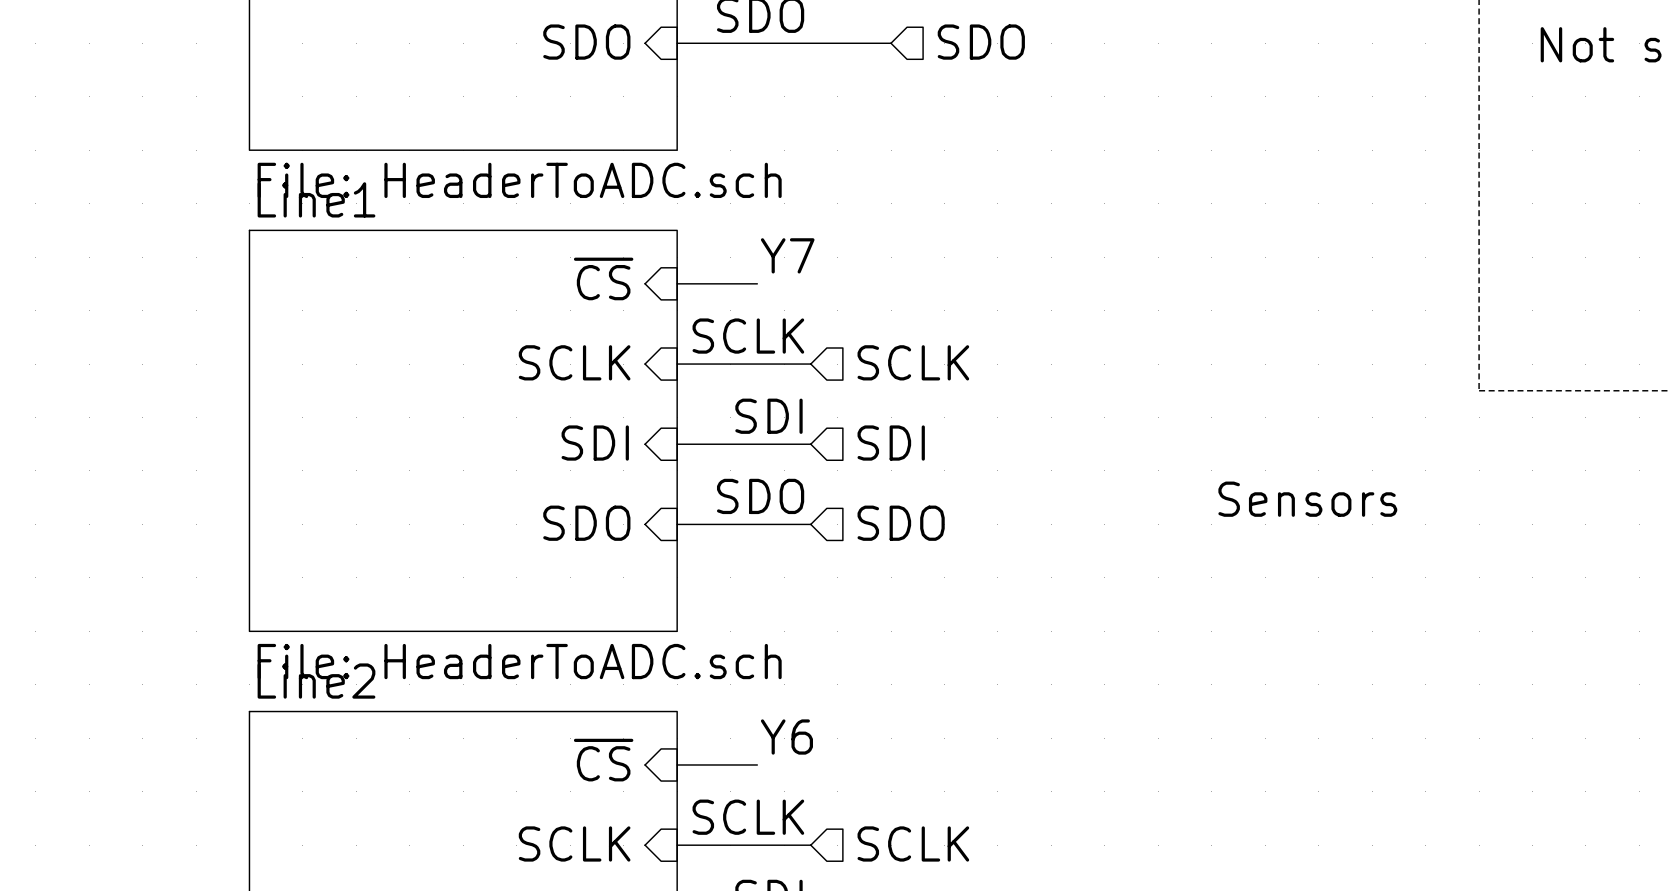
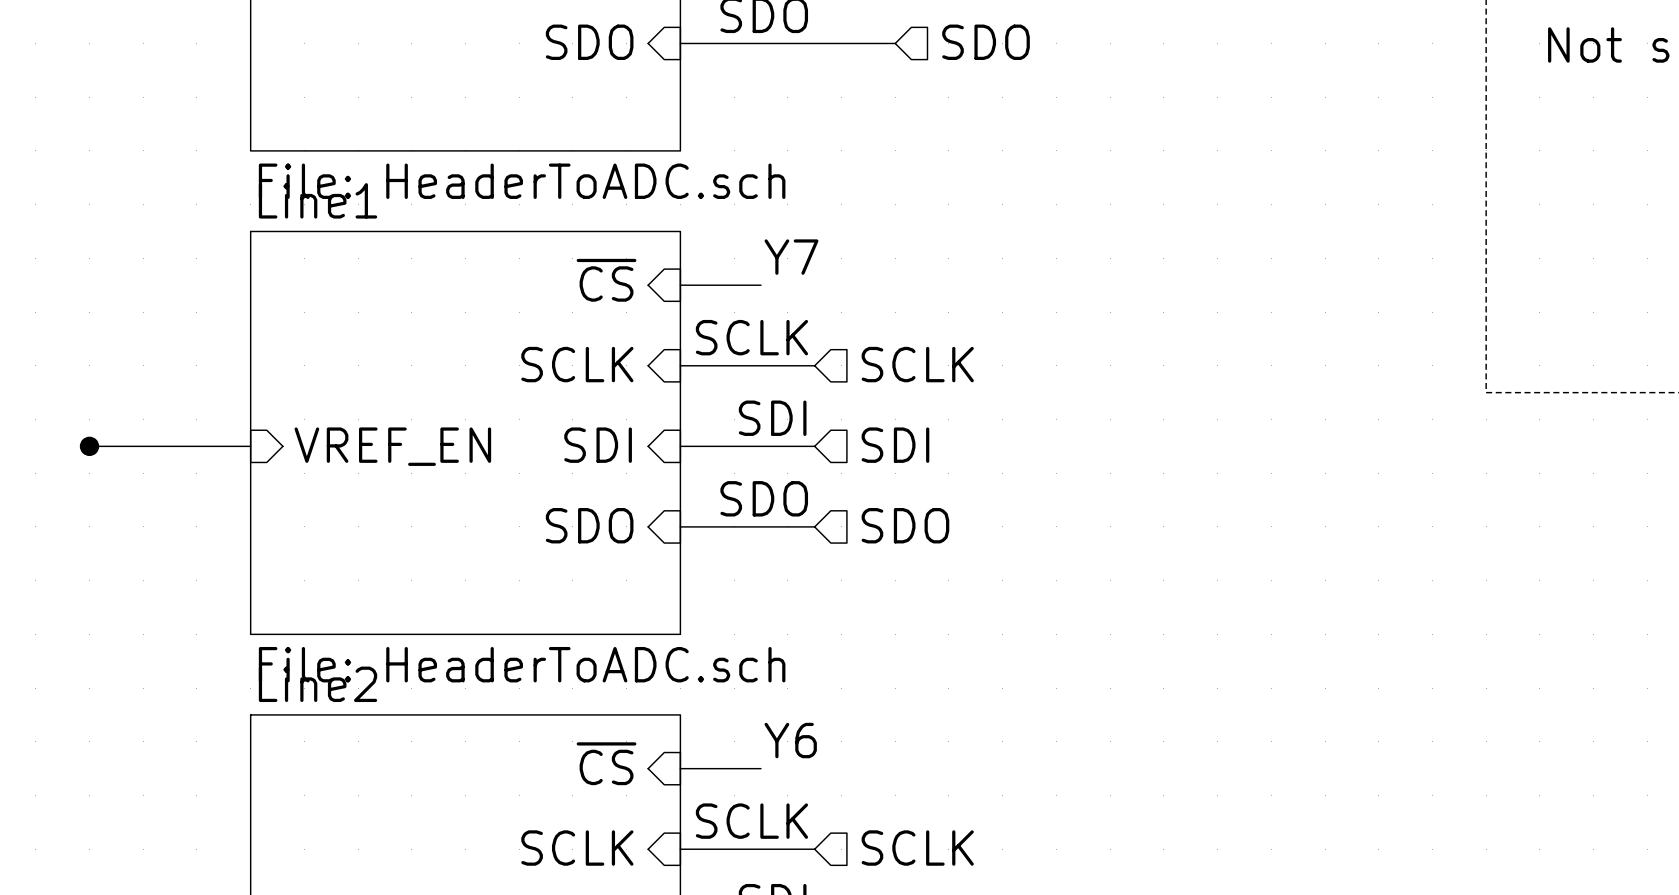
wire: none -> (89, 446) (250, 446)
junction: none -> (89, 446)
sheet pin: none -> VREF_EN (392, 446)
text: Sensors (1307, 499) -> none

